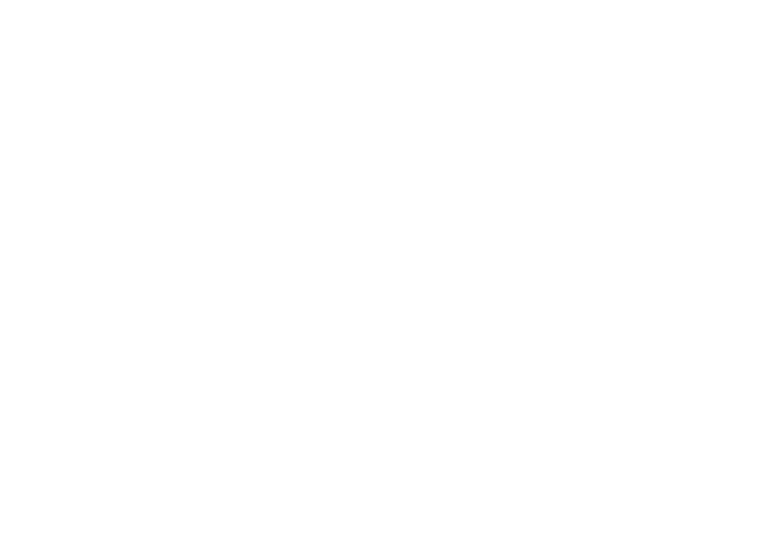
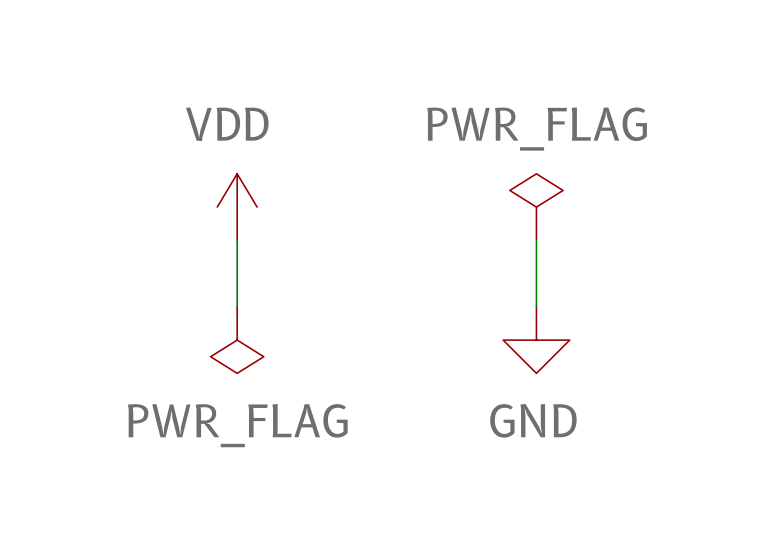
power symbol: none -> VDD (237, 207)
power symbol: none -> PWR_FLAG (536, 207)
wire: none -> (237, 240) (237, 306)
wire: none -> (536, 240) (536, 306)
power symbol: none -> PWR_FLAG (237, 340)
power symbol: none -> GND (536, 340)

